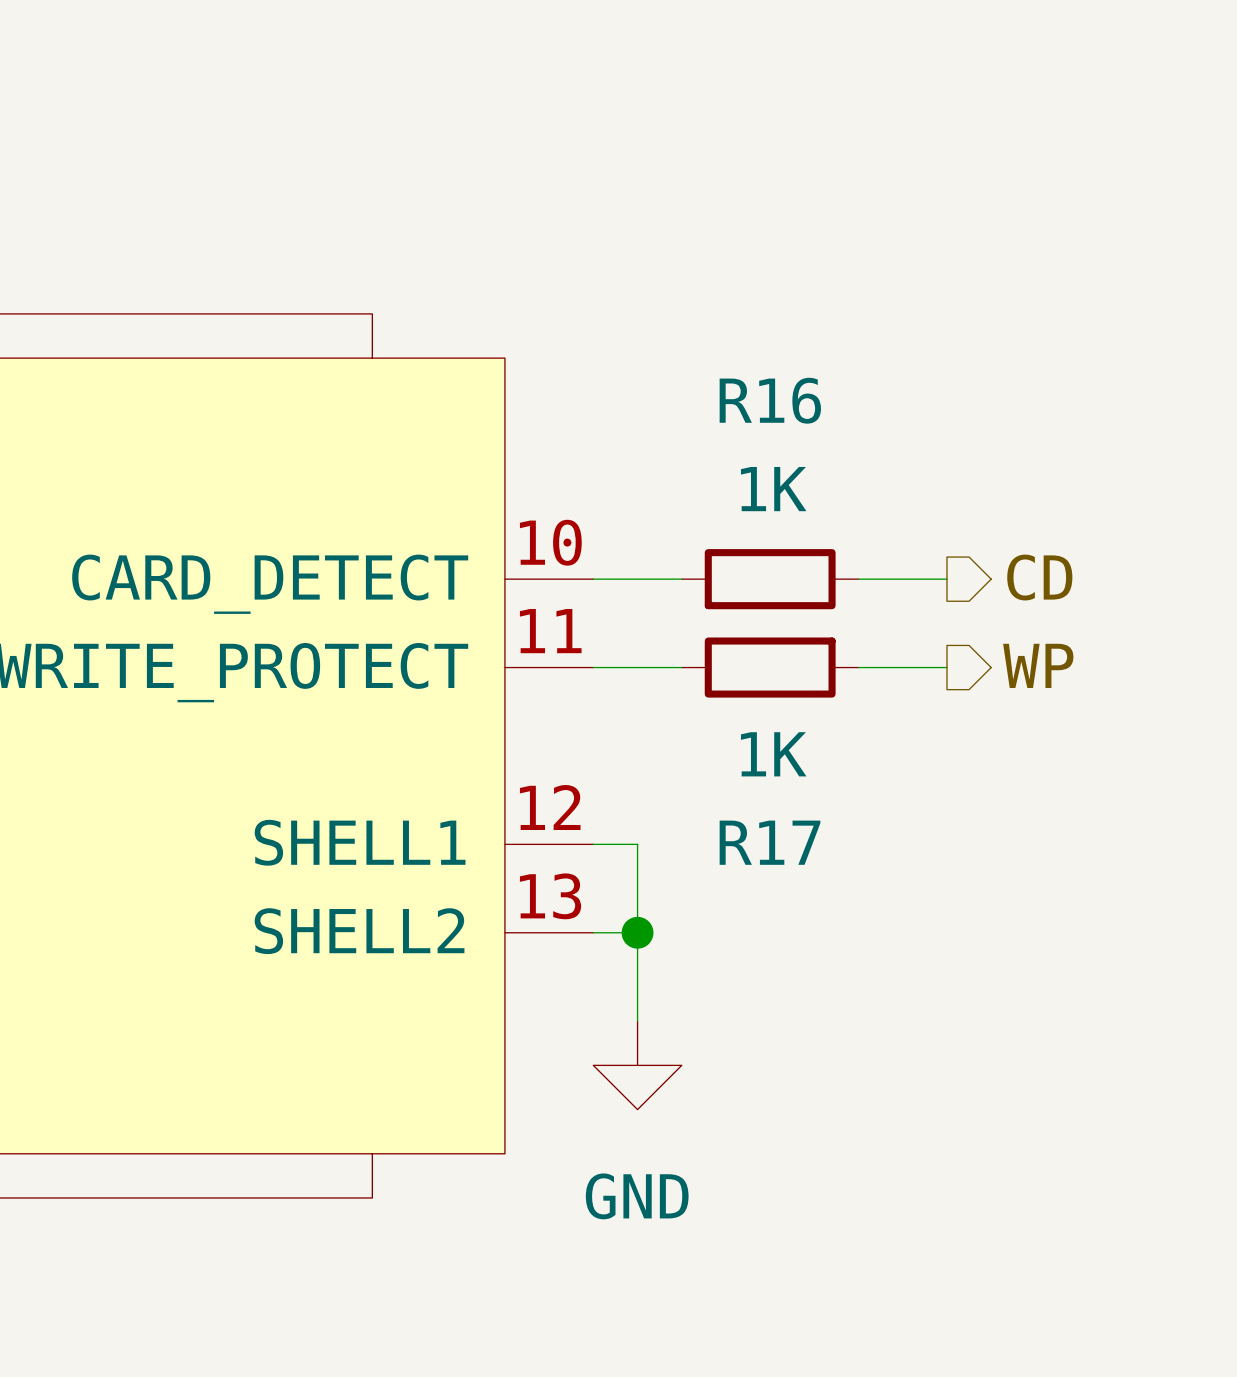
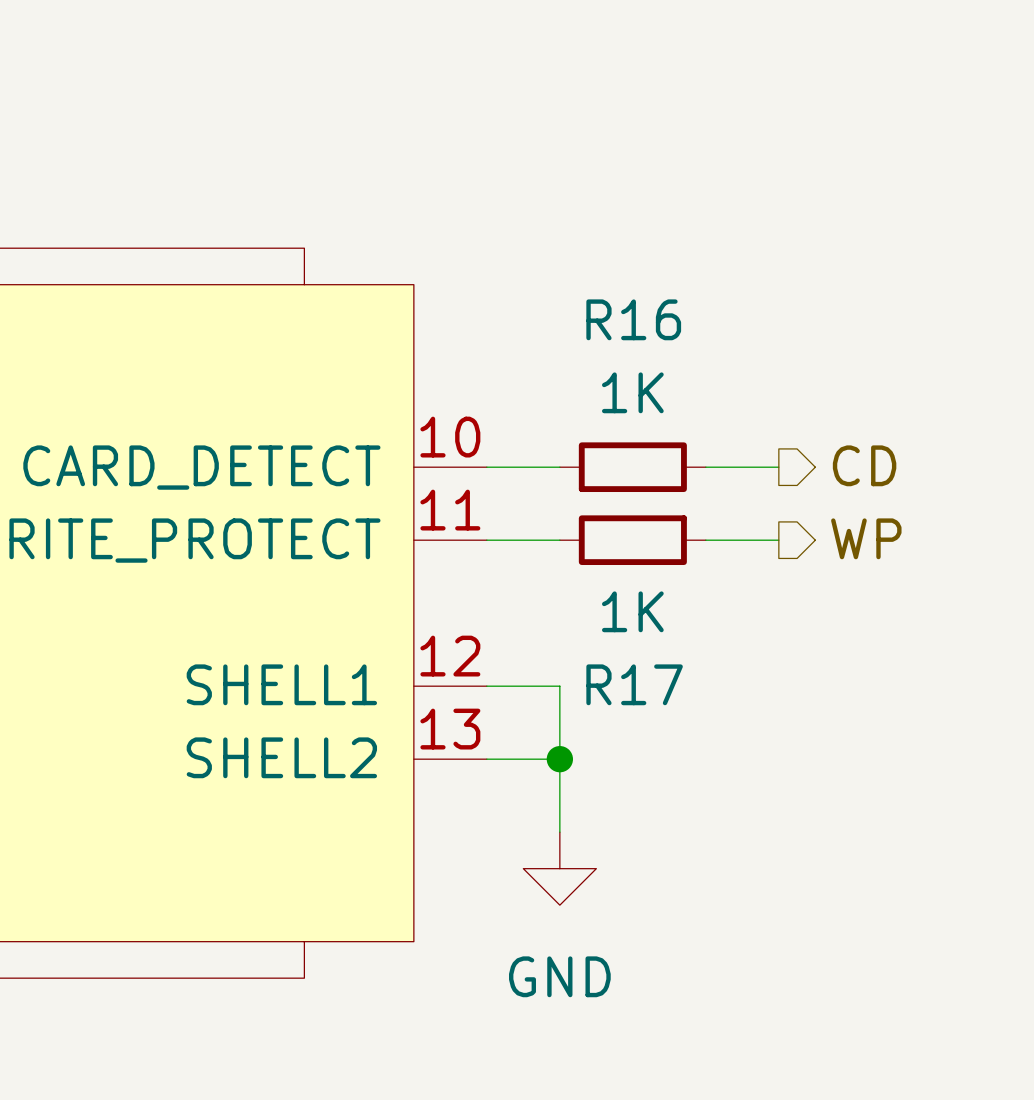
wire: (637, 844) (637, 1021) -> (523, 686) (559, 686) (559, 832)
wire: none -> (523, 759) (559, 759)
junction position: (637, 932) -> (559, 759)
power symbol position: GND (637, 1065) -> GND (559, 868)

